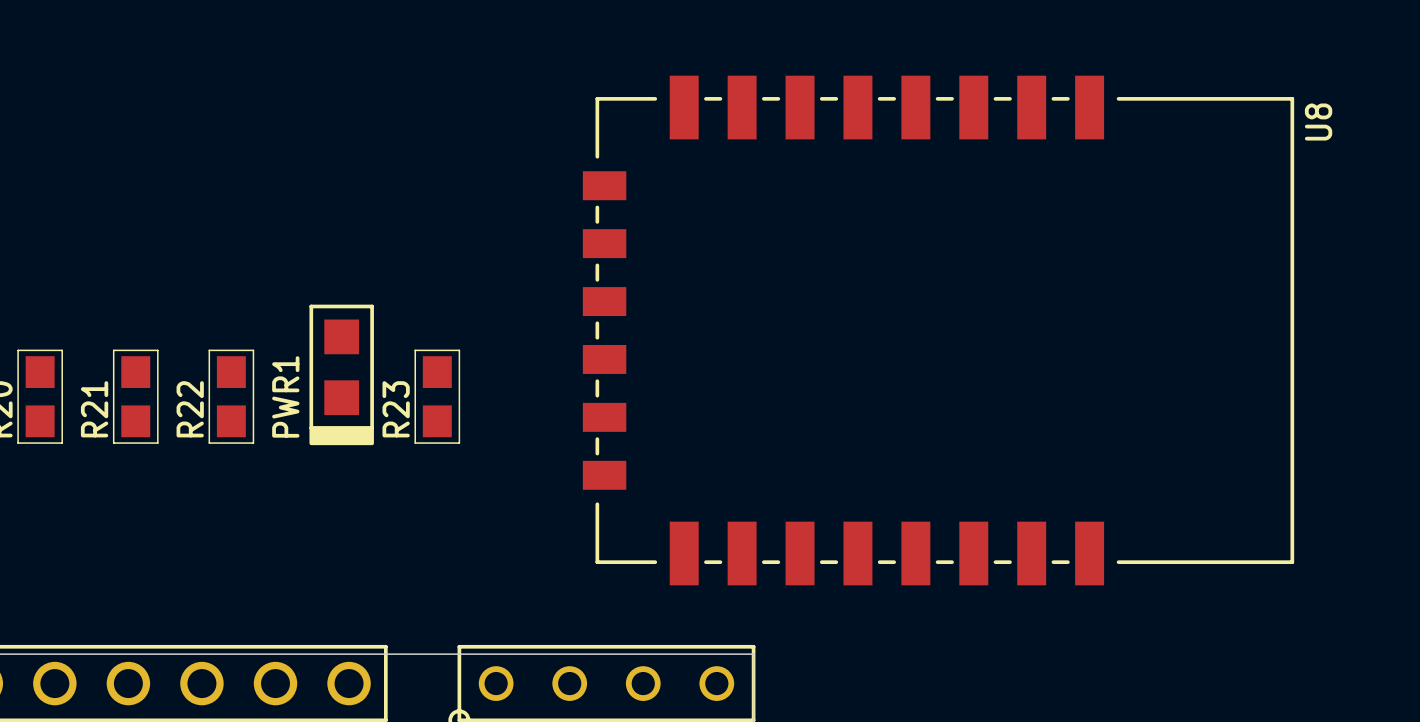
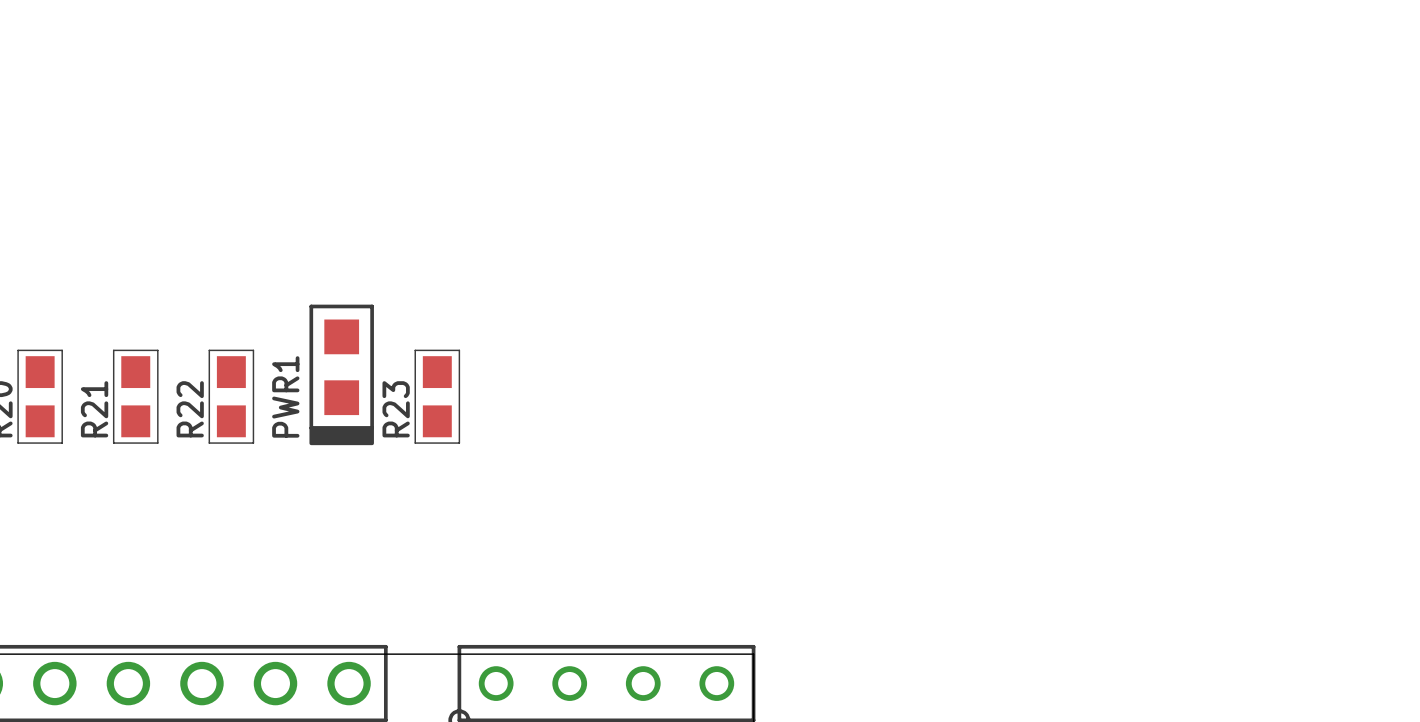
U8: (938, 330) -> none

